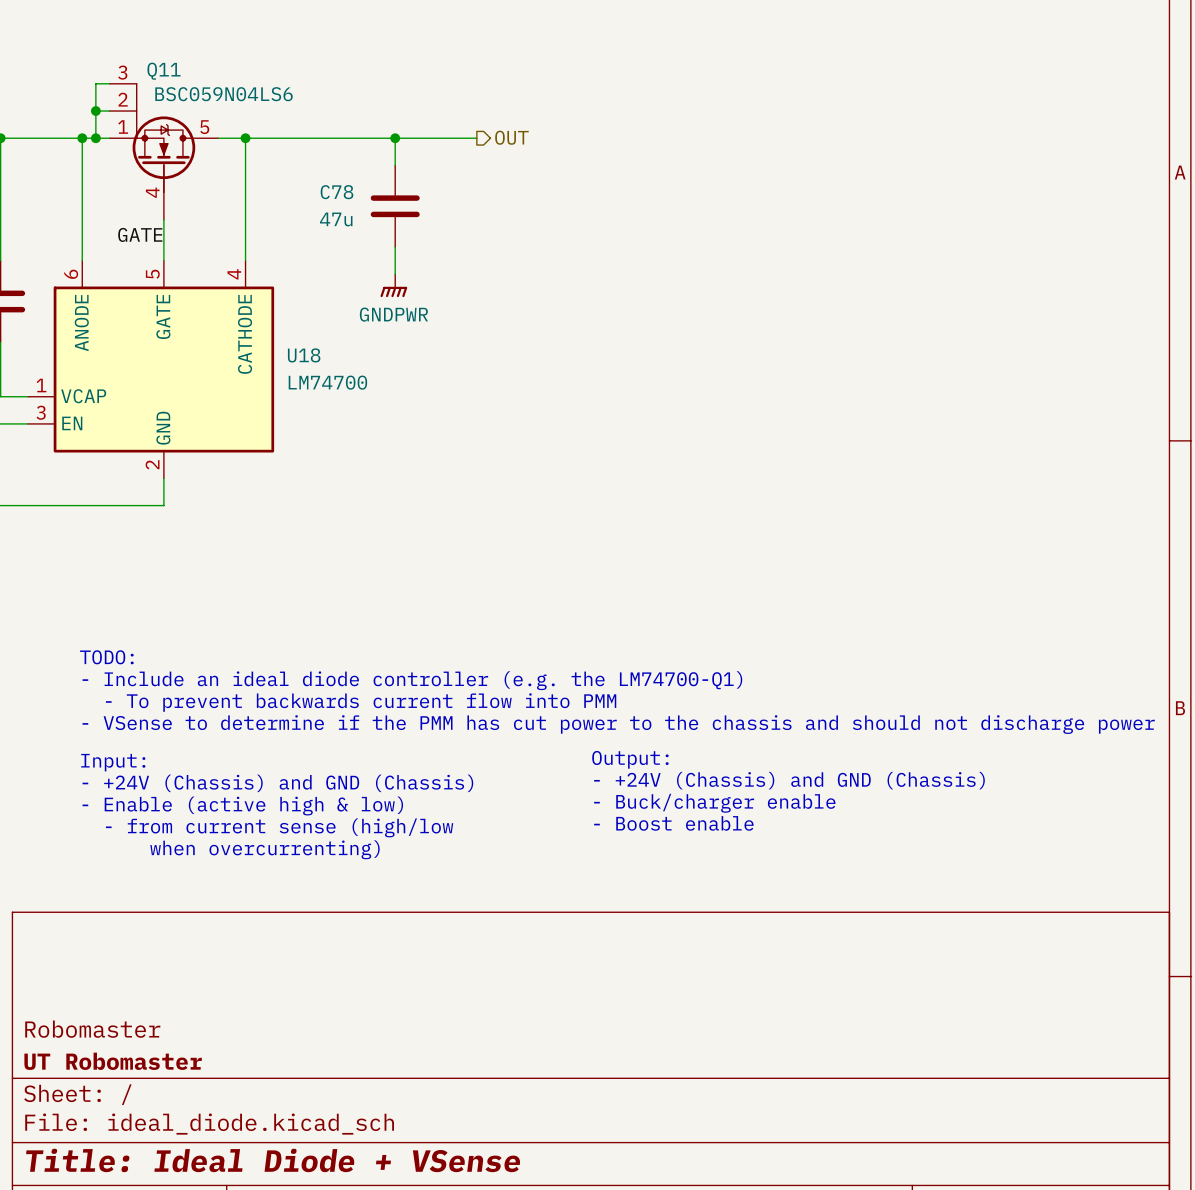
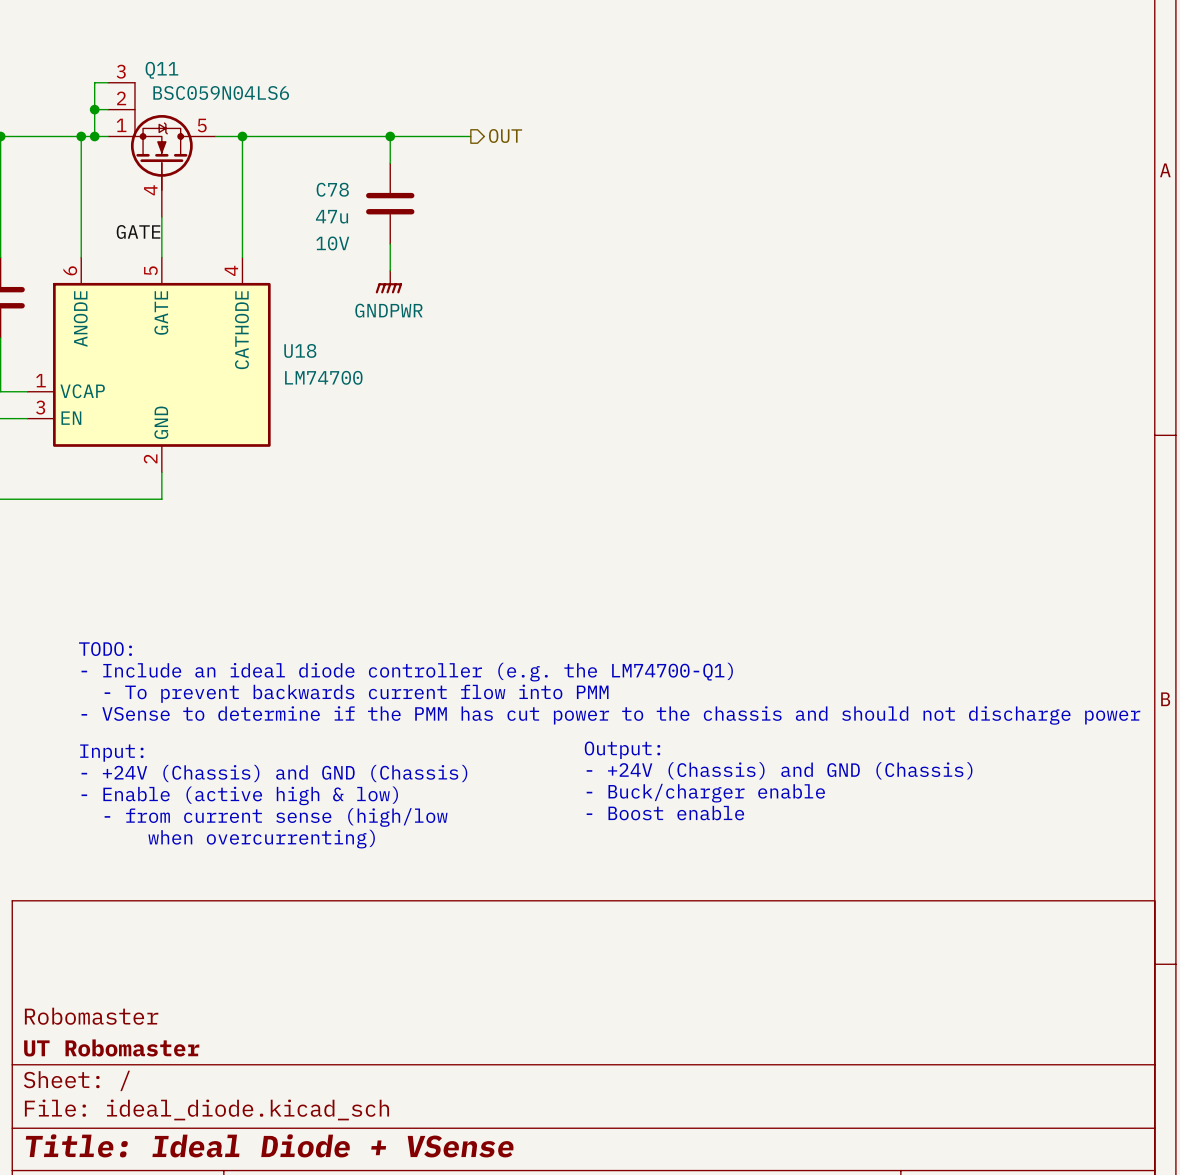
C78 text: none -> 10V (332, 243)

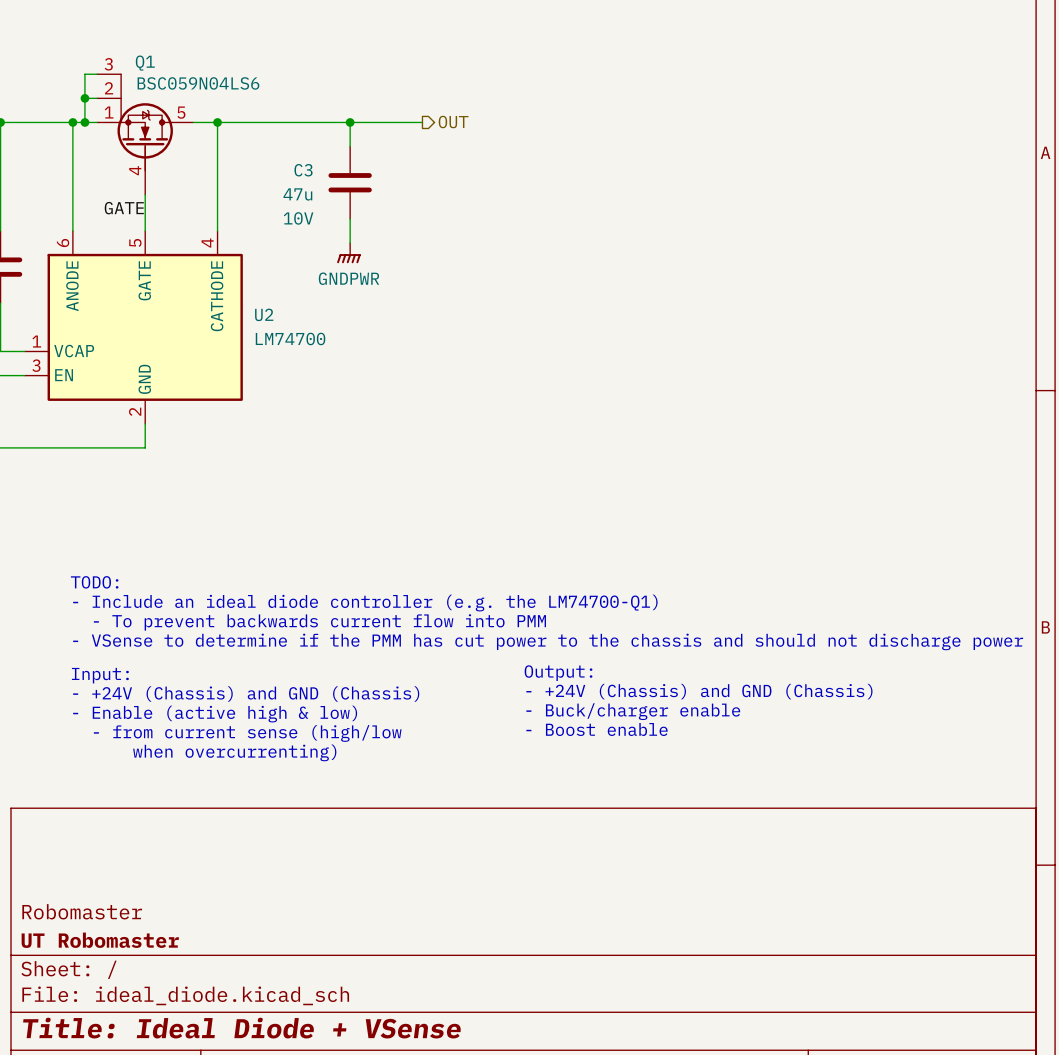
Q11 name: Q11 (161, 70) -> Q1 (145, 63)
C78 name: C78 (332, 189) -> C3 (303, 170)
U18 name: U18 (300, 350) -> U2 (264, 314)

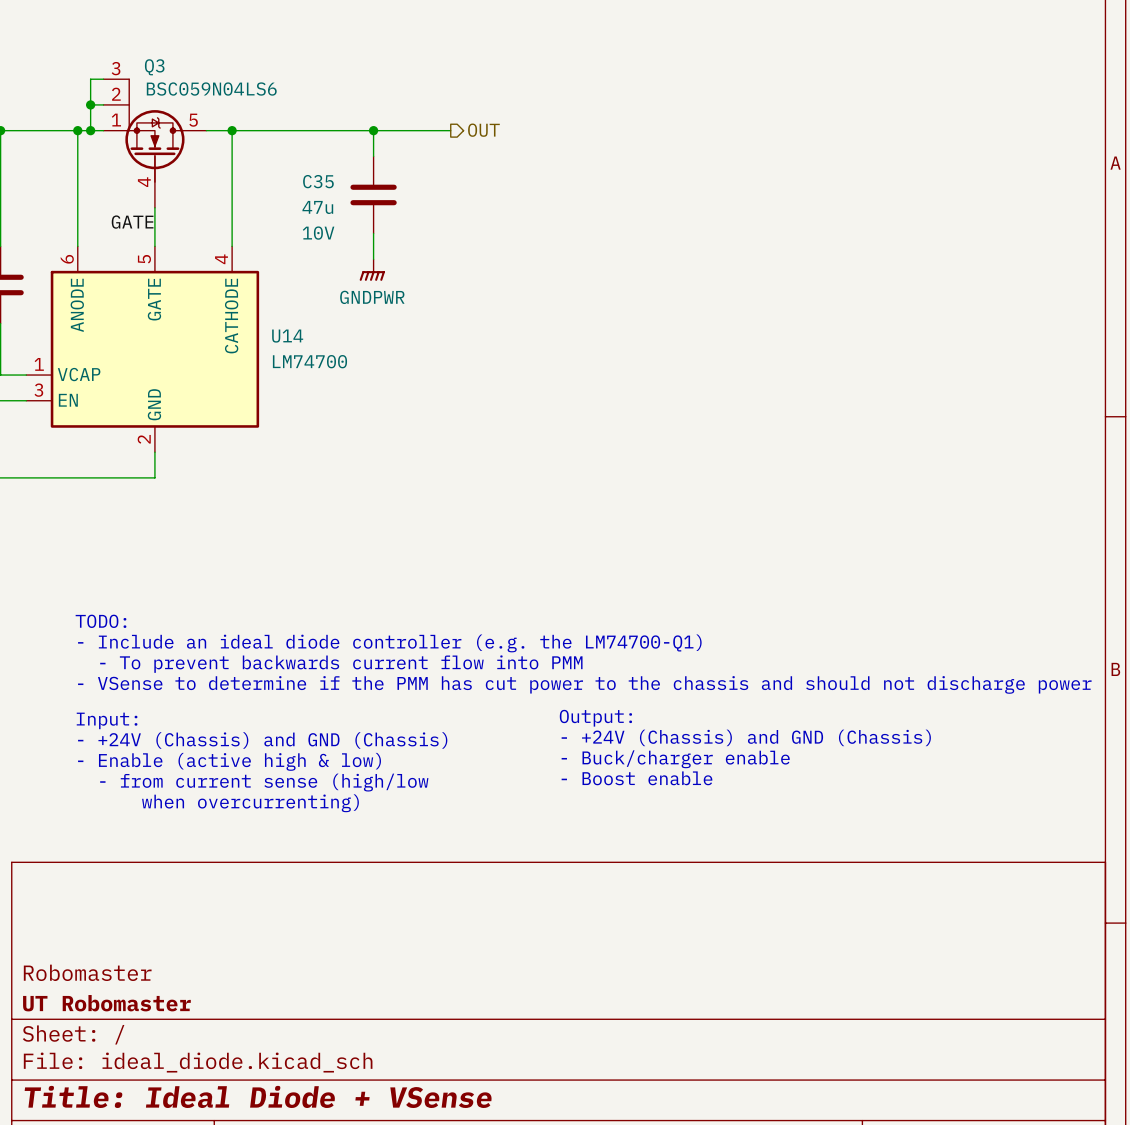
Q1 name: Q1 (145, 63) -> Q3 (154, 67)
C3 name: C3 (303, 170) -> C35 (318, 181)
U2 name: U2 (264, 314) -> U14 (287, 336)

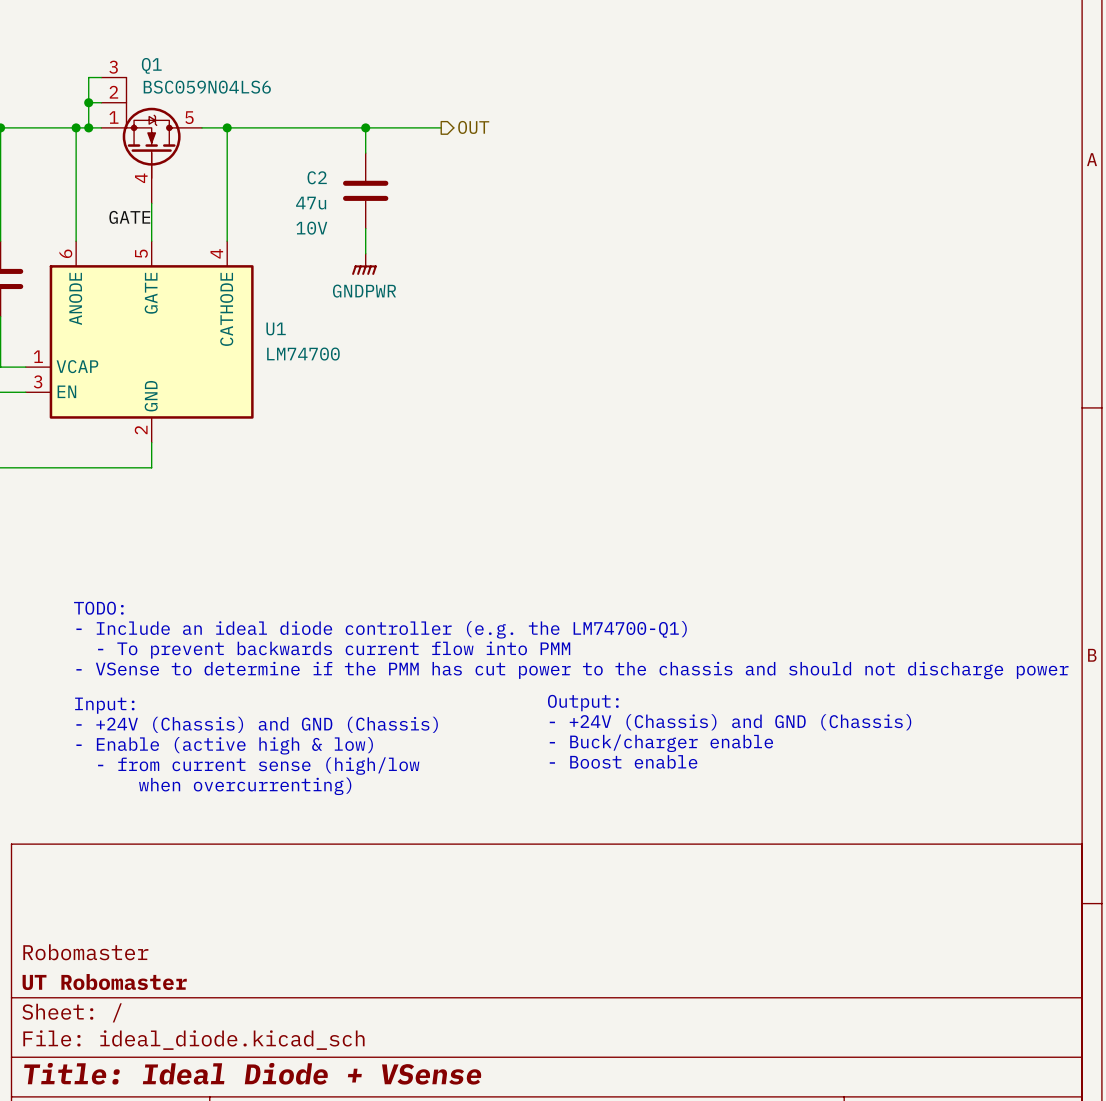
Q3 name: Q3 (154, 67) -> Q1 (151, 65)
C35 name: C35 (318, 181) -> C2 (317, 177)
U14 name: U14 (287, 336) -> U1 (276, 328)

